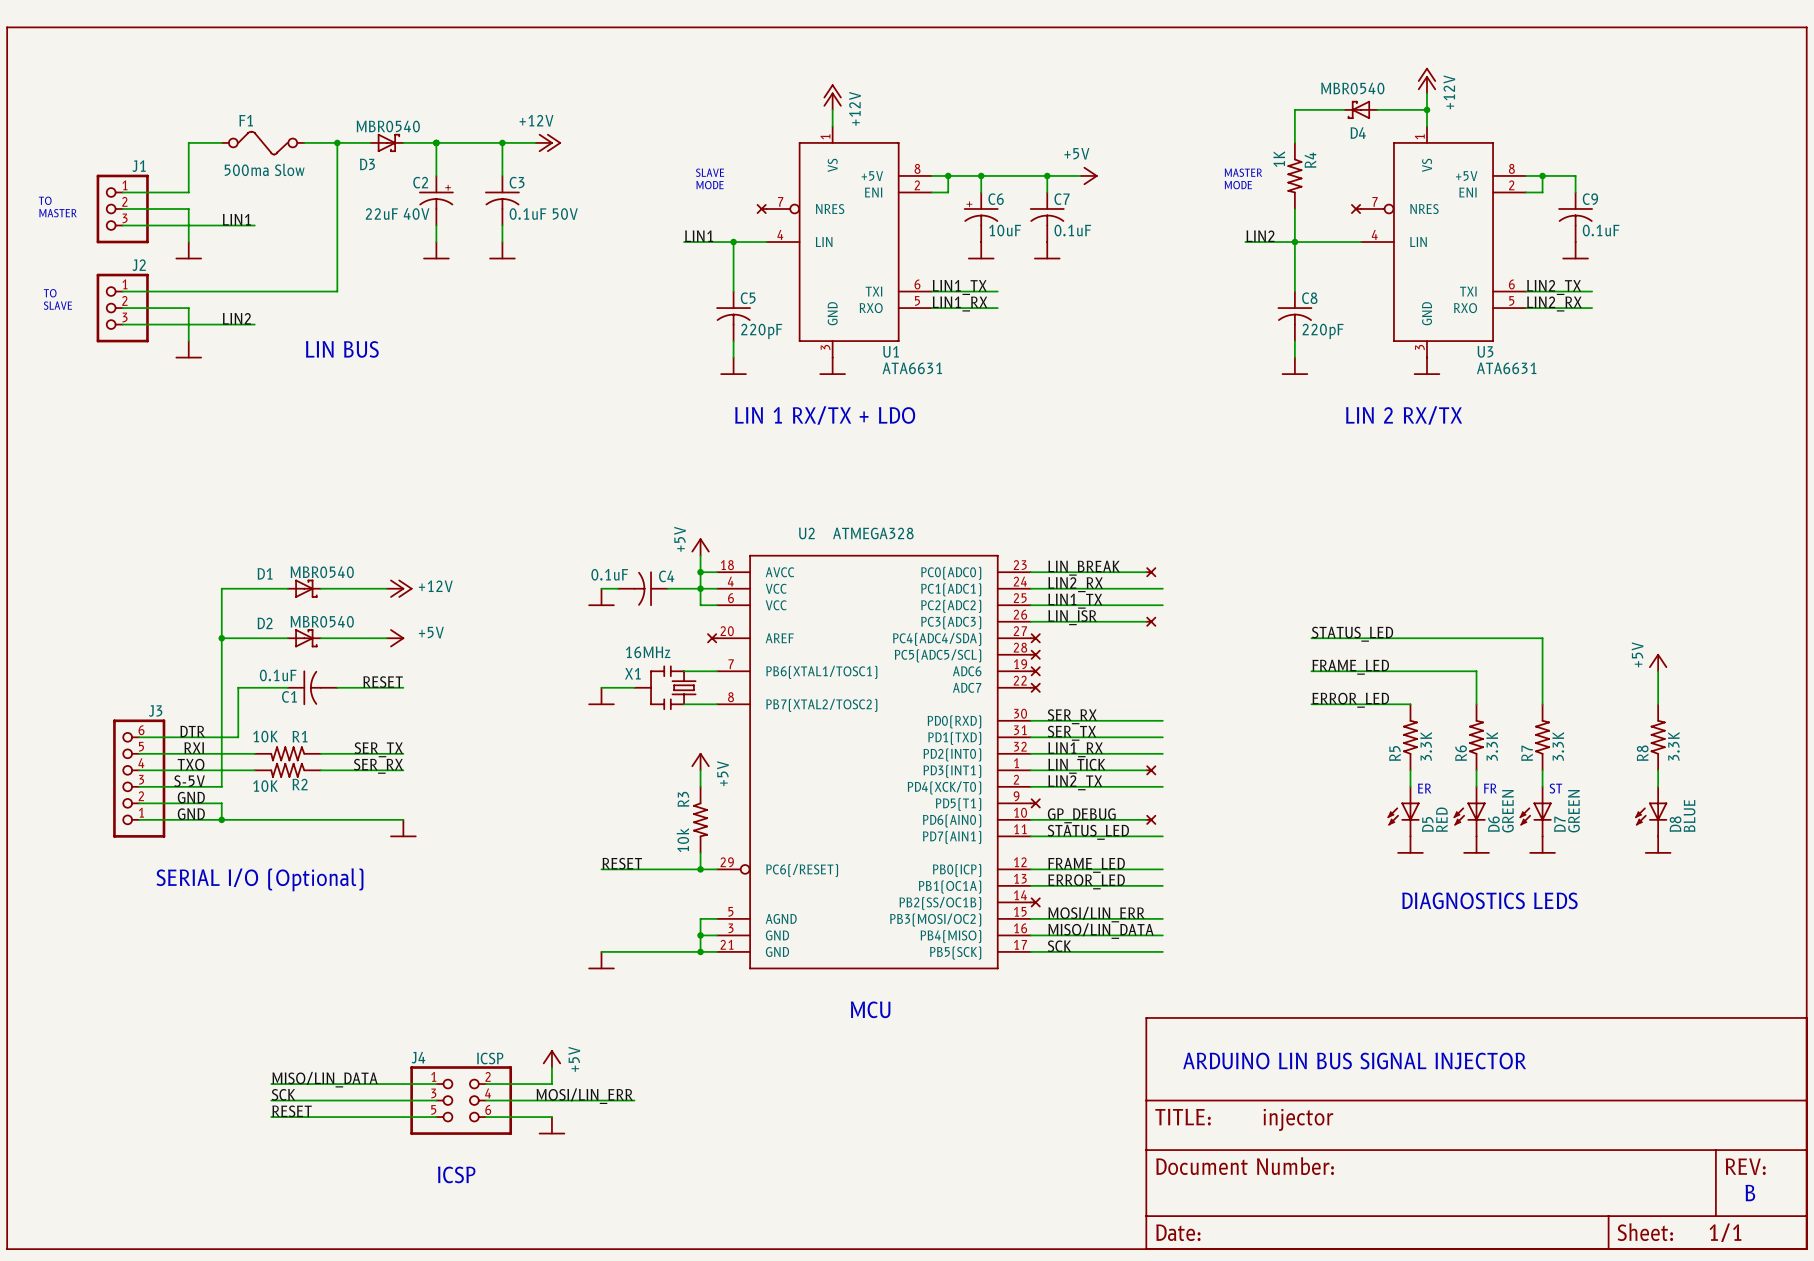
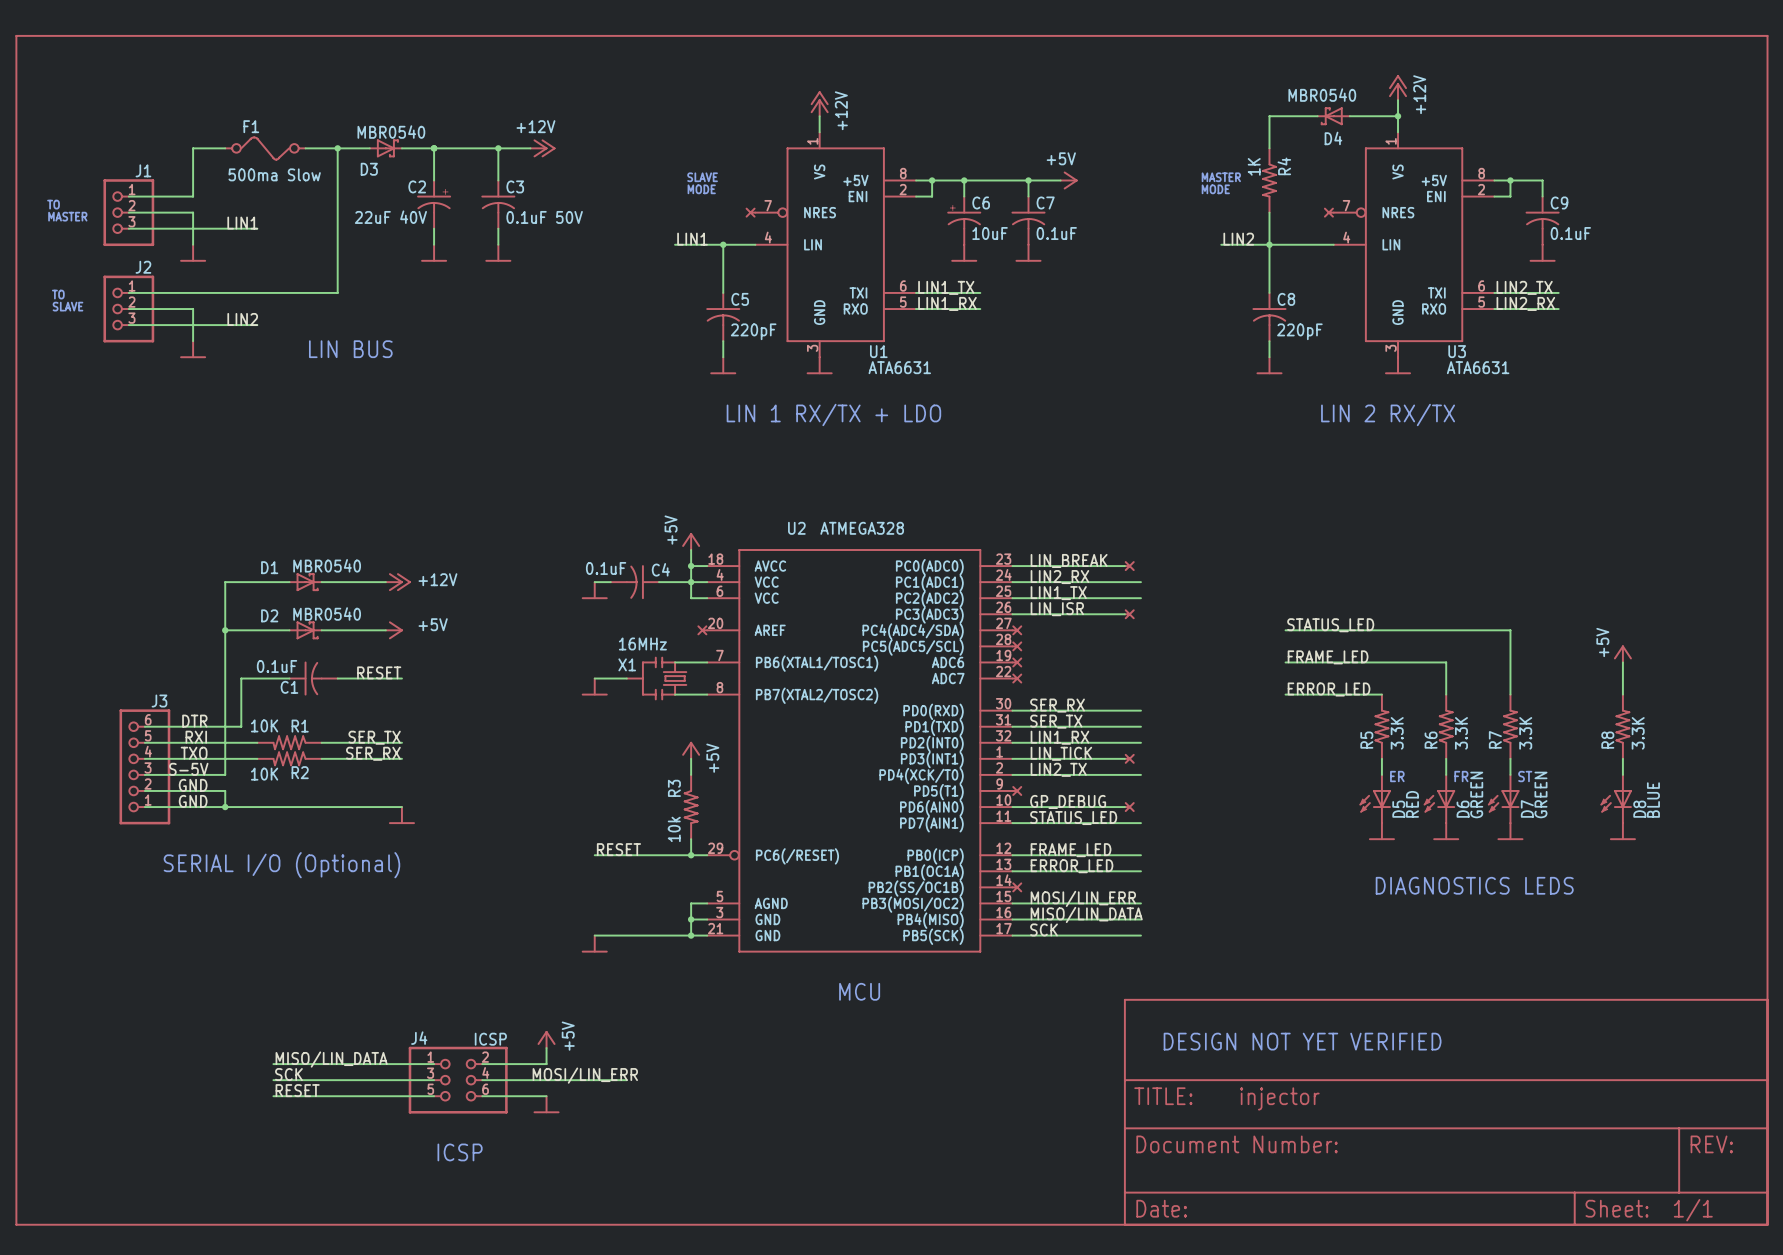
text: ARDUINO LIN BUS SIGNAL INJECTOR (1354, 1061) -> DESIGN NOT YET VERIFIED (1302, 1041)
text: B (1750, 1193) -> none

